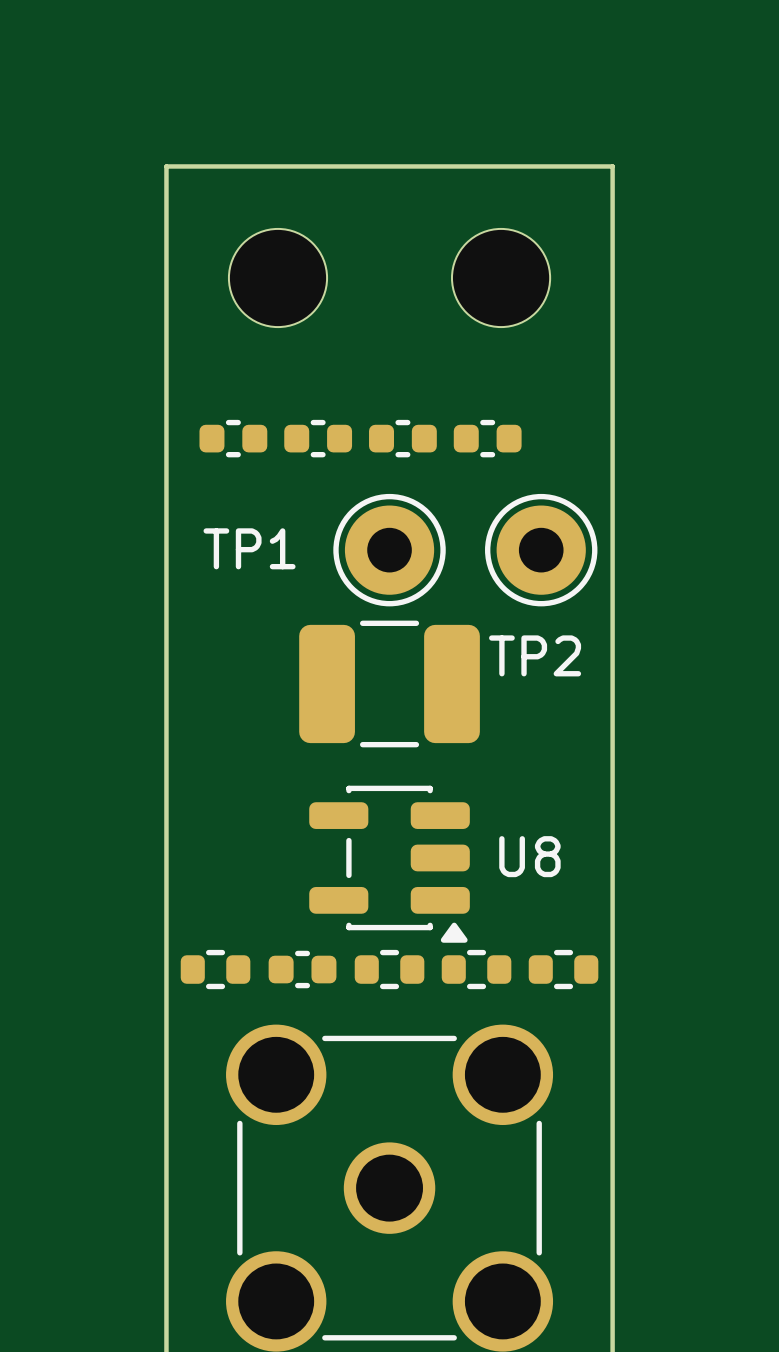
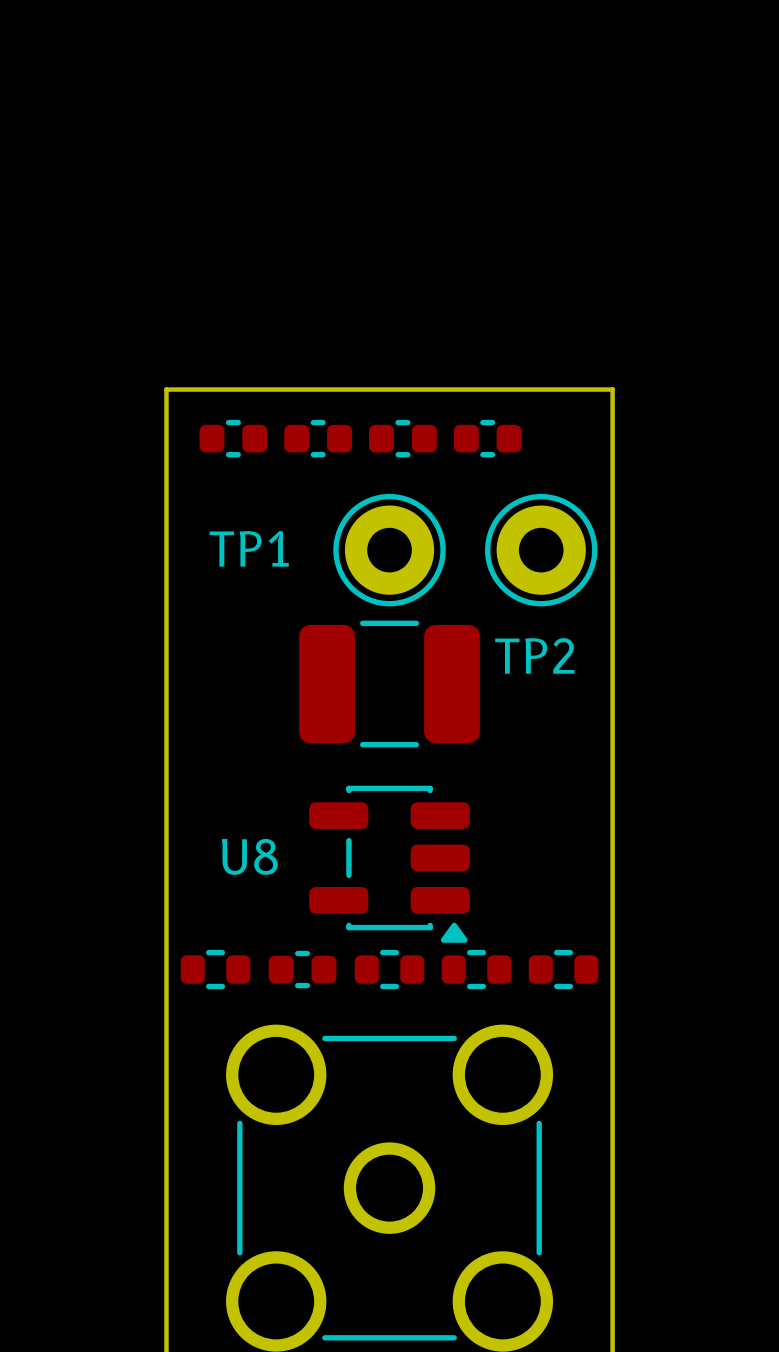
part: (278, 278) -> none
part: (501, 278) -> none
board edge: (166, 389) (166, 166) (612, 166) (612, 389) -> (166, 389) (612, 389)
text position: U8 (529, 856) -> U8 (249, 856)

